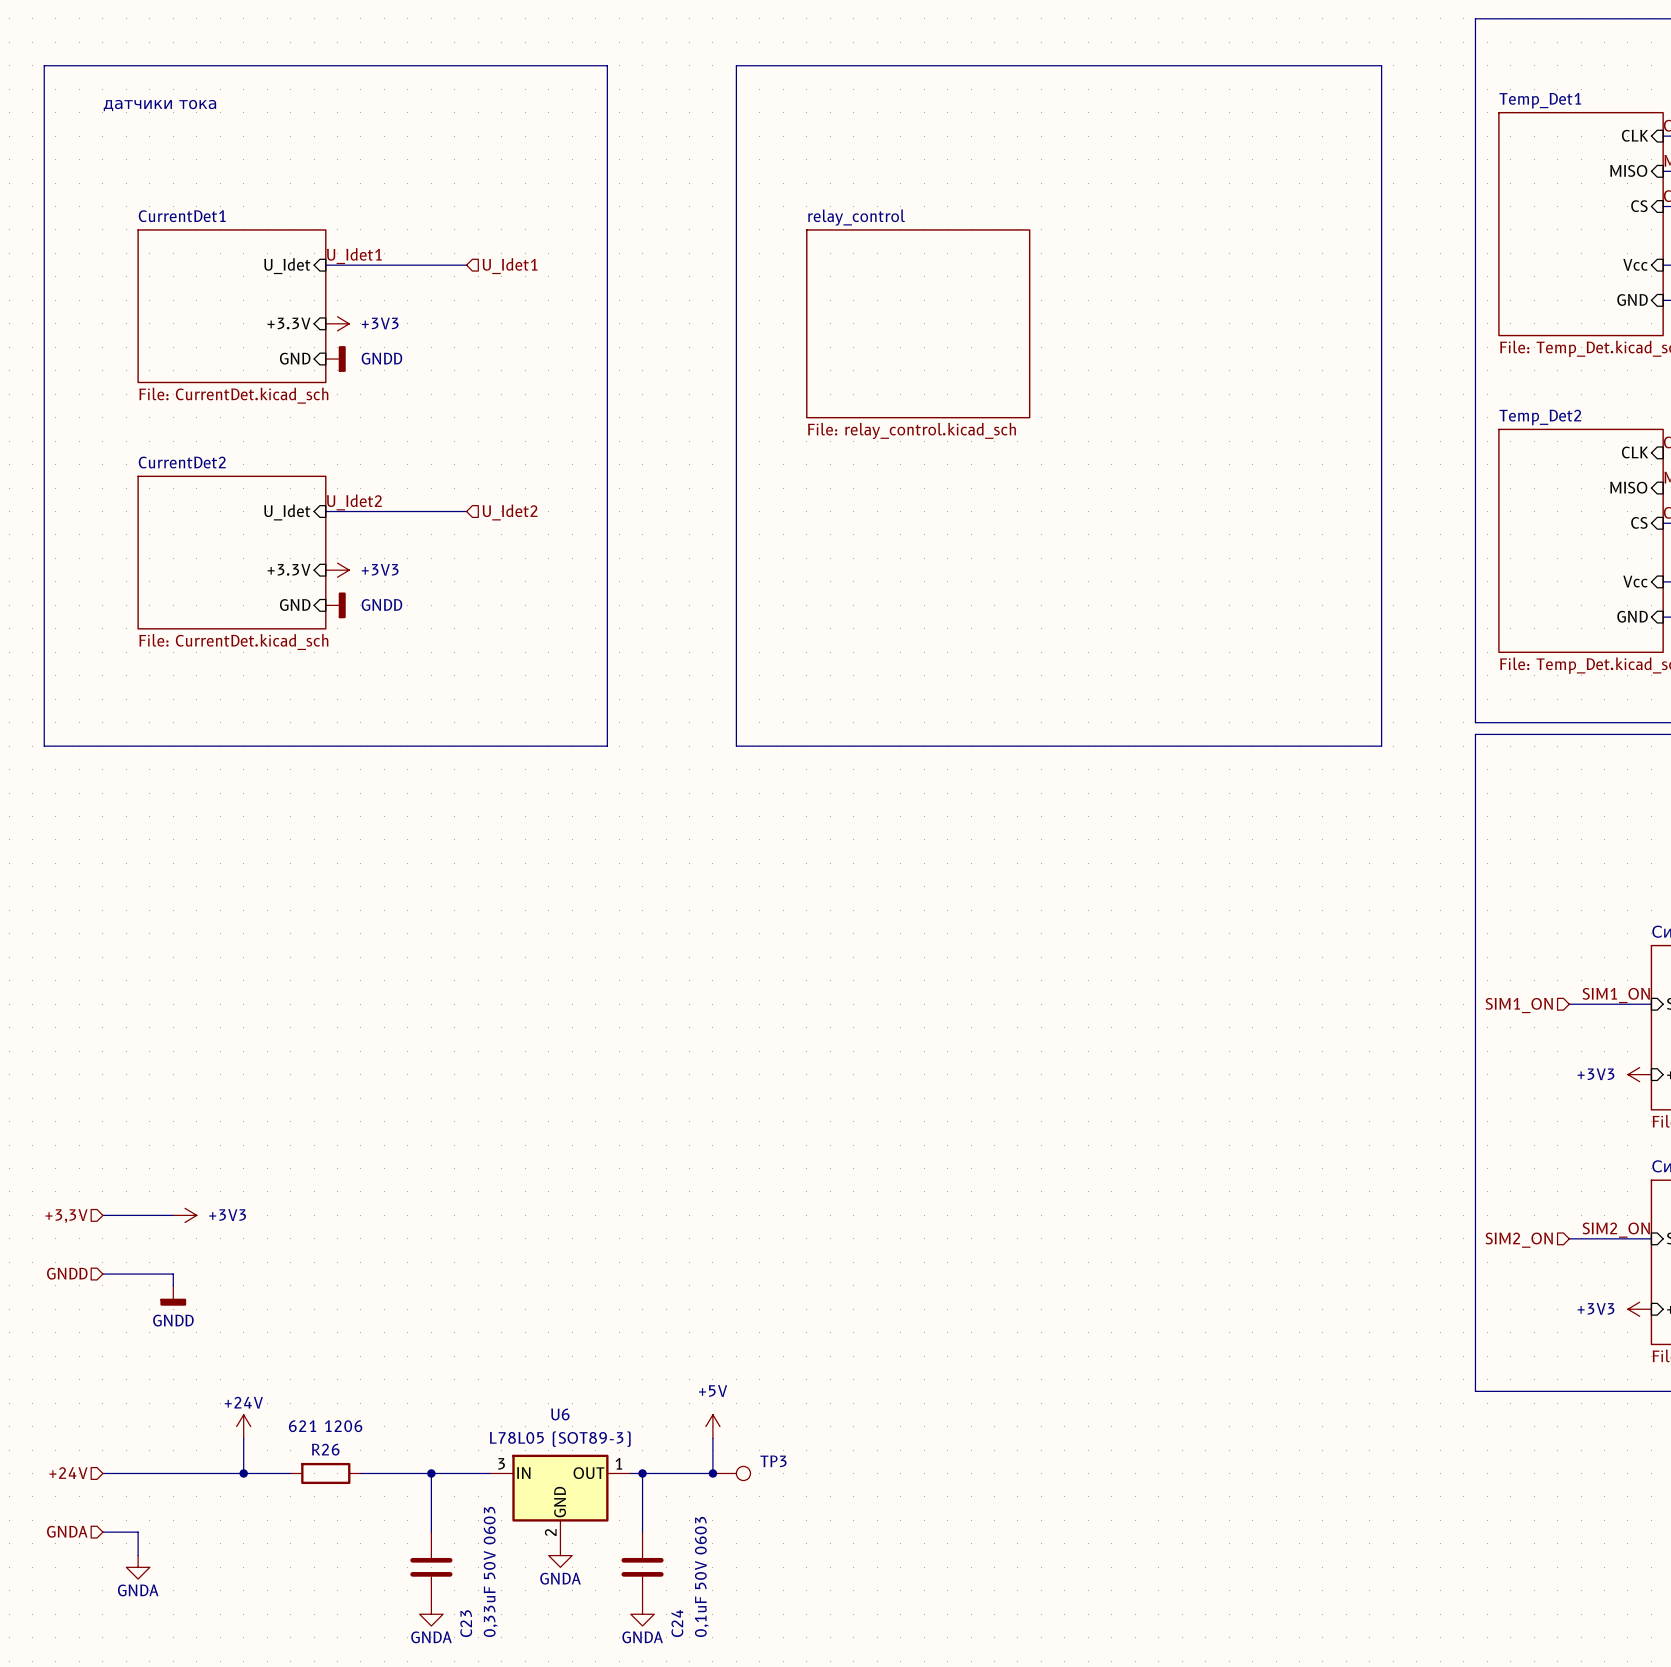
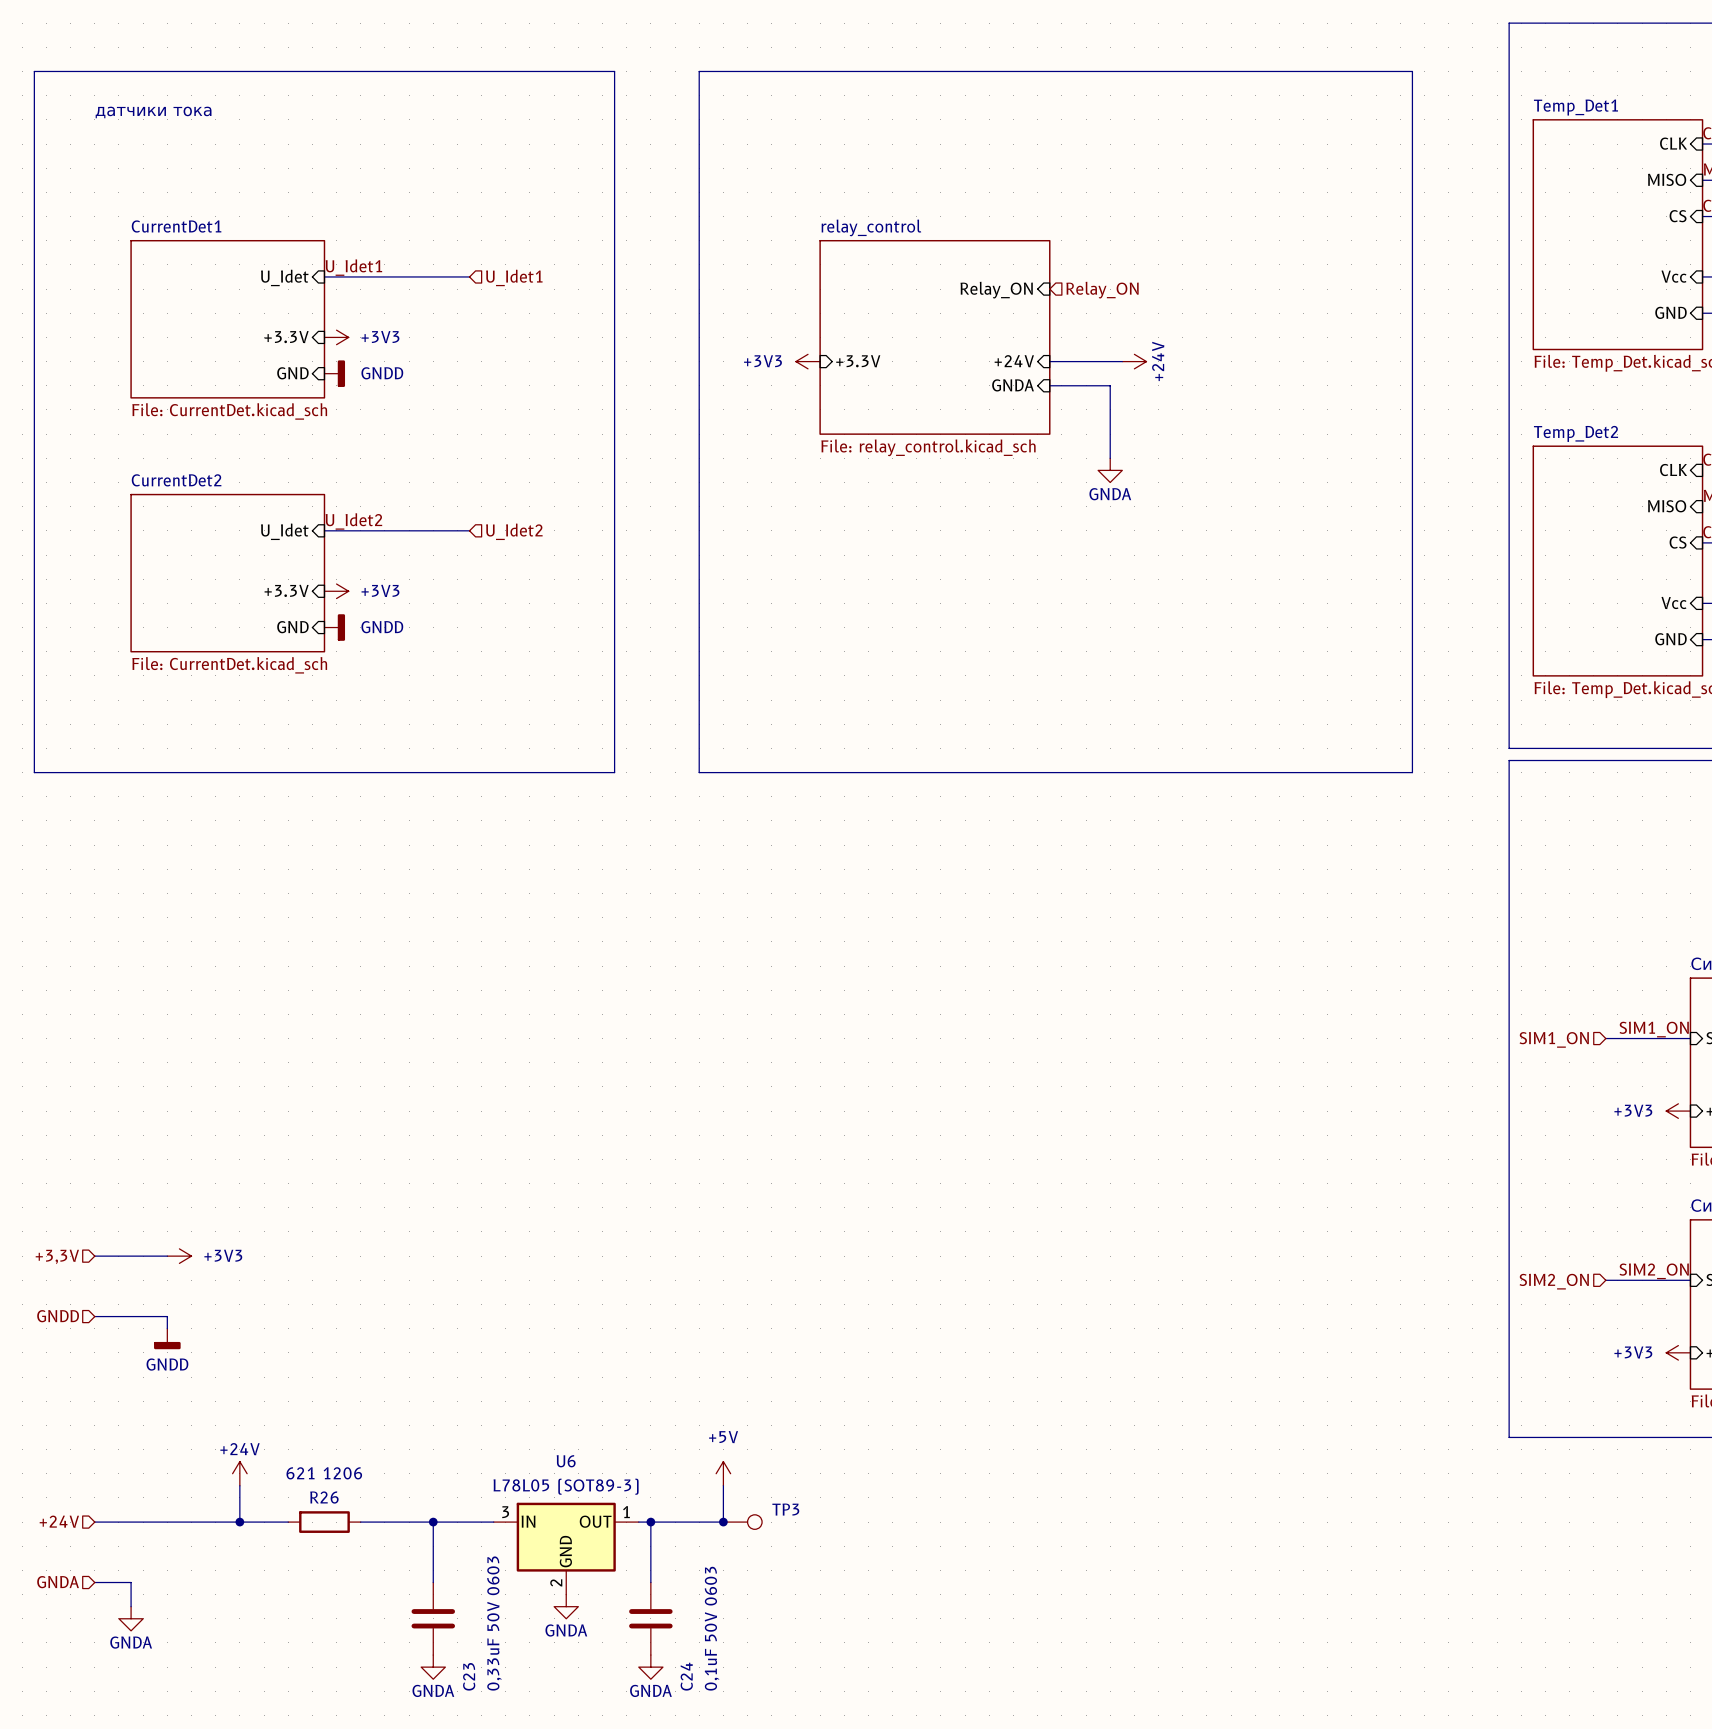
line: (736, 65) (736, 746) -> (747, 71) (699, 71) (699, 772) (747, 772)
sheet pin: none -> Relay_ON (996, 290)
hierarchical label: none -> Relay_ON (1102, 290)
sheet pin: none -> +3.3V (858, 361)
sheet pin: none -> +24V (1014, 361)
power symbol: none -> +3V3 (808, 361)
wire: none -> (1049, 361) (1122, 361)
power symbol: none -> +24V (1134, 361)
sheet pin: none -> GNDA (1013, 385)
wire: none -> (1049, 385) (1110, 385) (1110, 458)
power symbol: none -> GNDA (1110, 470)

